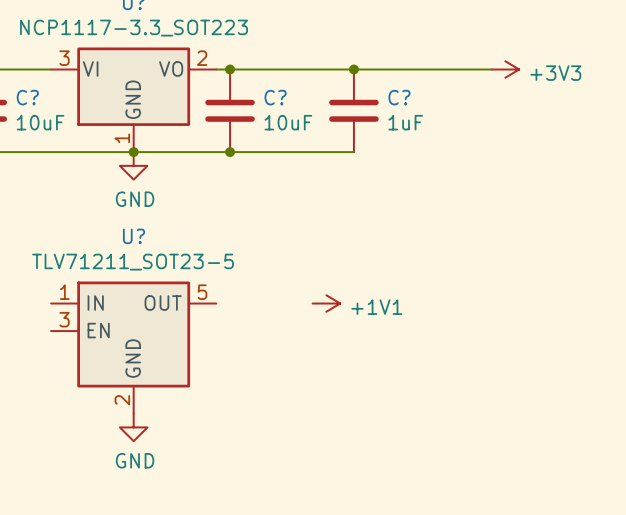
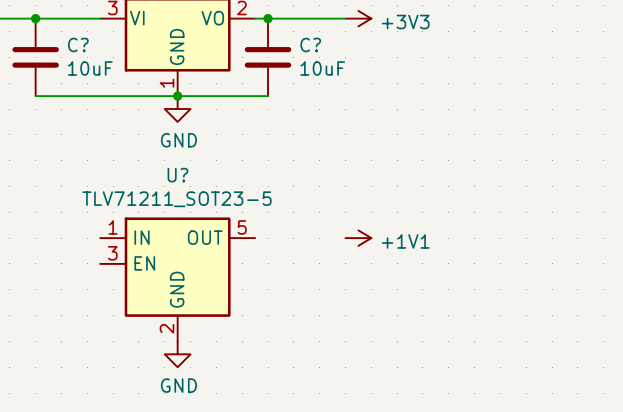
wire: (312, 69) (491, 69) -> none
junction: (353, 69) -> none
power symbol position: +3V3 (505, 69) -> +3V3 (358, 18)
C?: 1uF (353, 110) -> none
wire: (230, 152) (353, 152) -> none
junction: (230, 152) -> none

